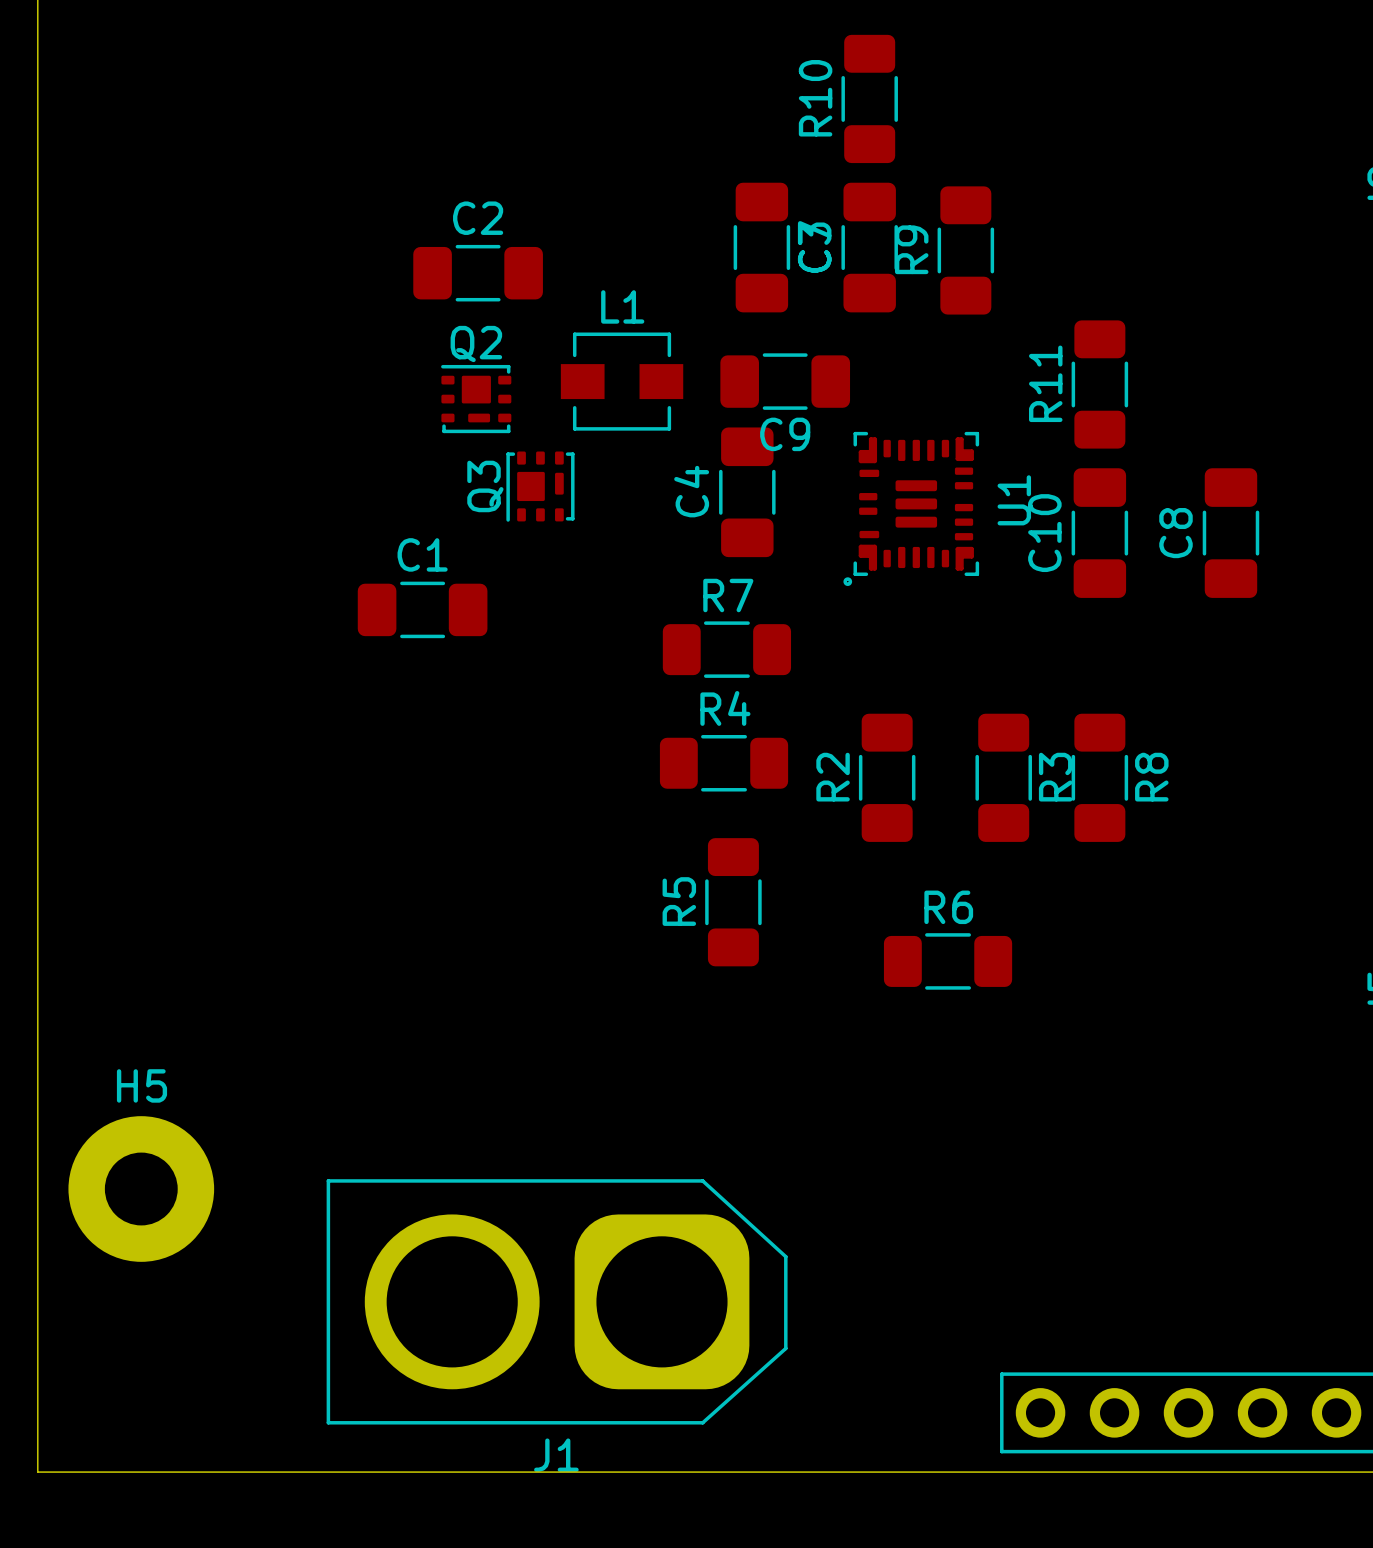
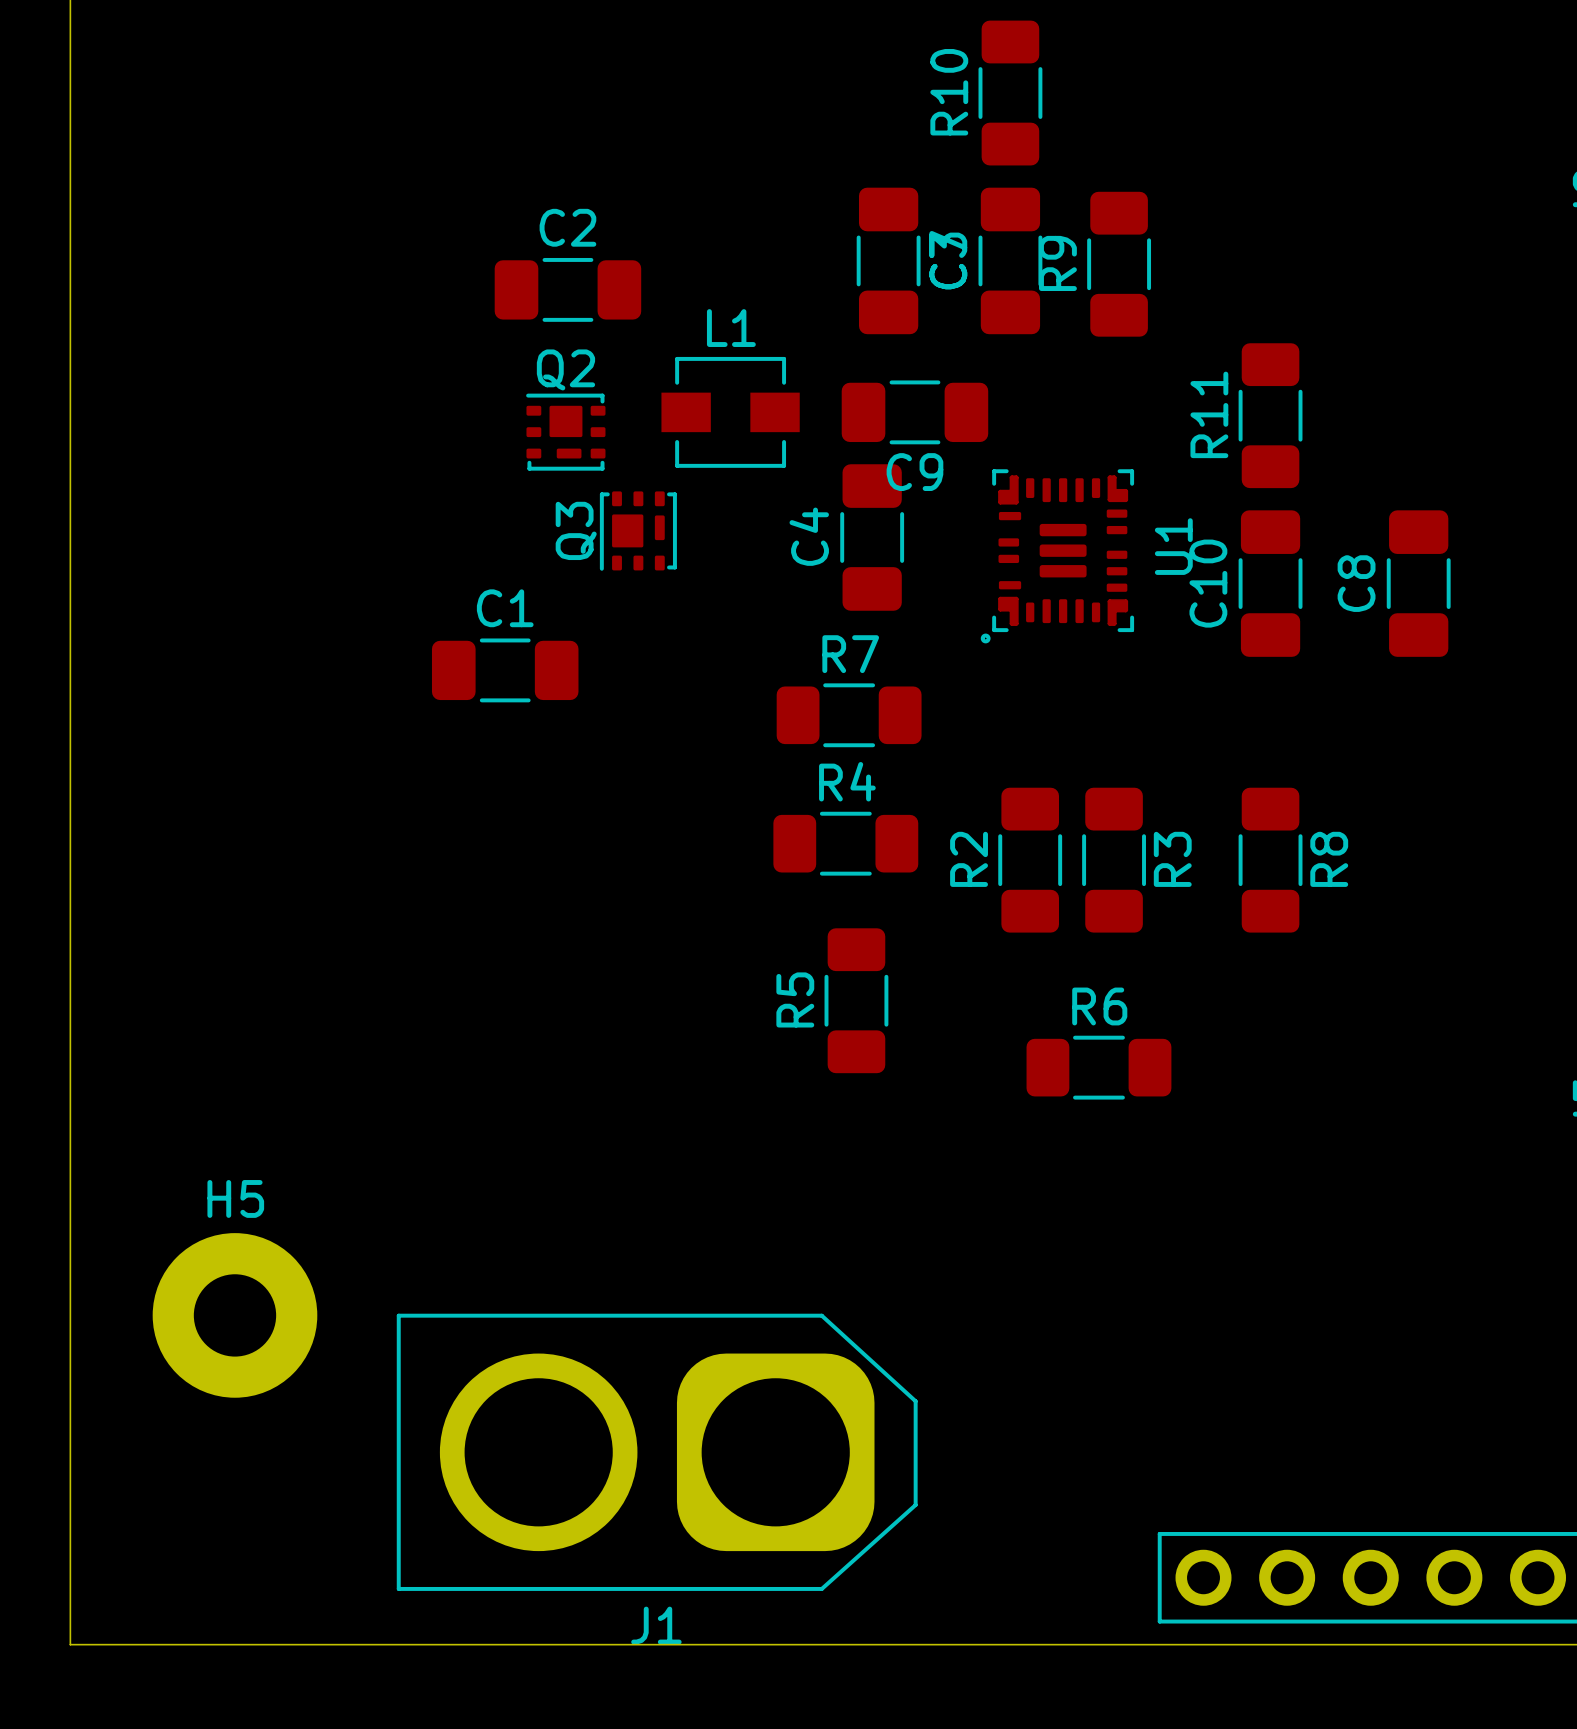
R3 position: (1003, 777) -> (1114, 860)
H5 position: (141, 1189) -> (234, 1315)

